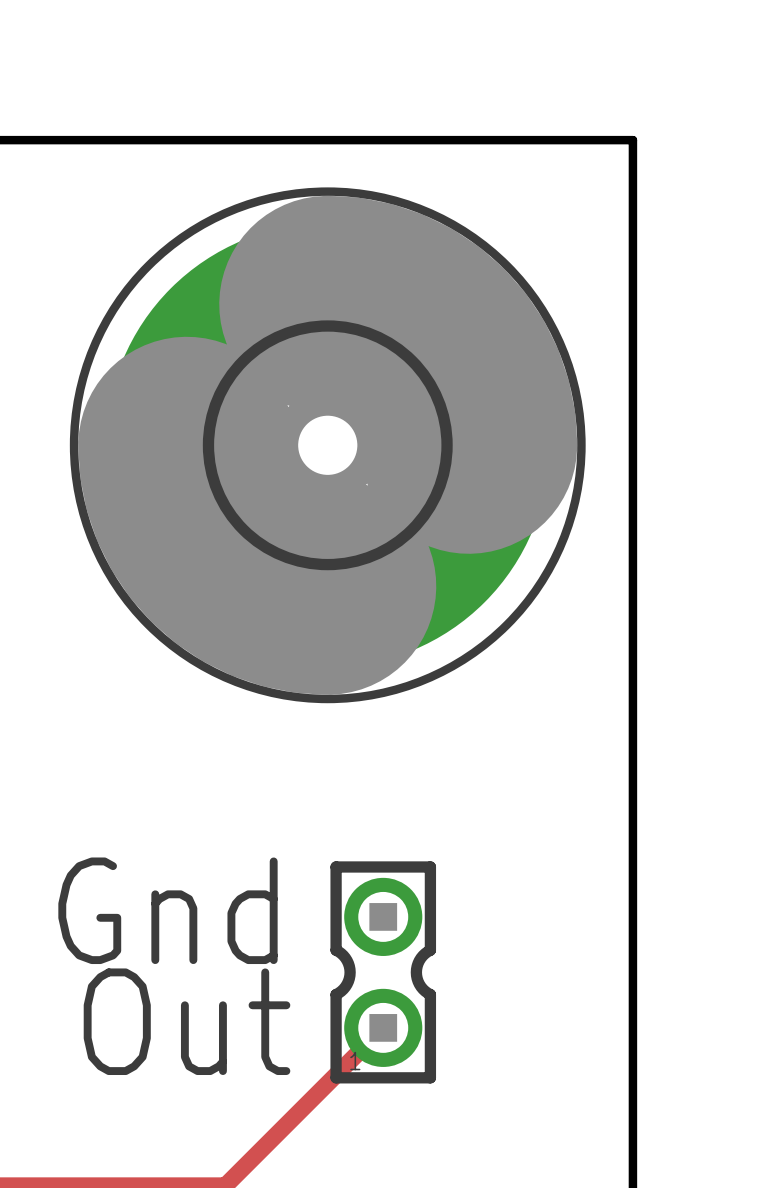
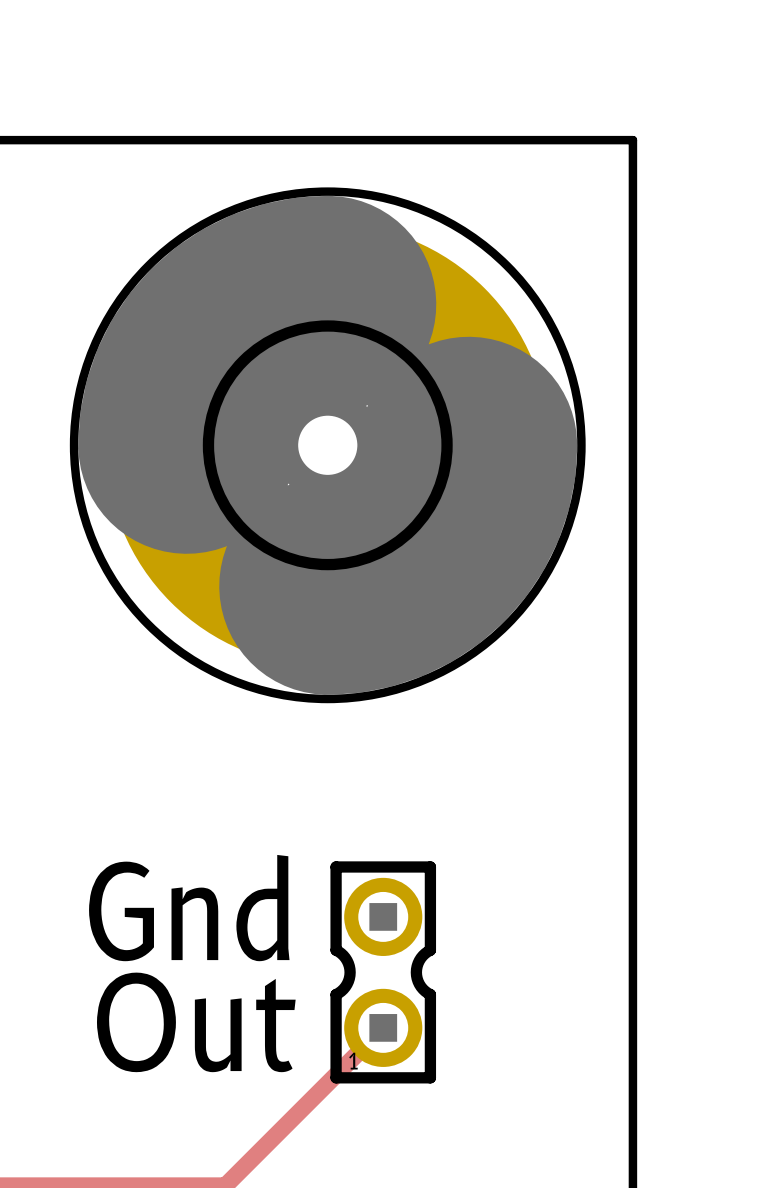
part rotation: 0° (327, 445) -> 90° clockwise (327, 445)

